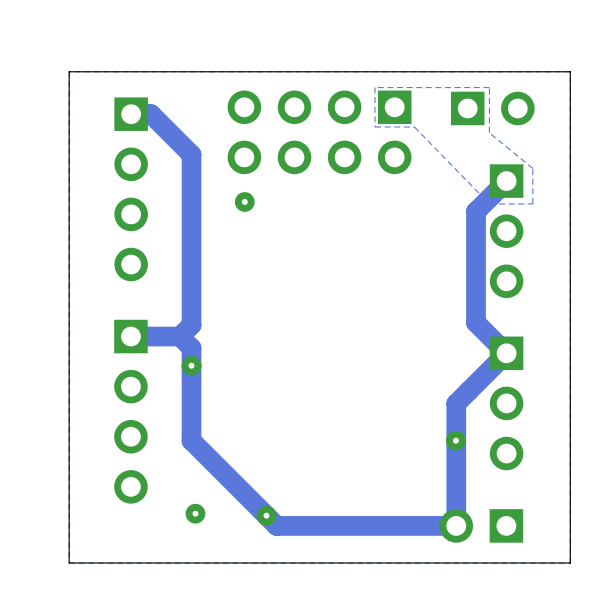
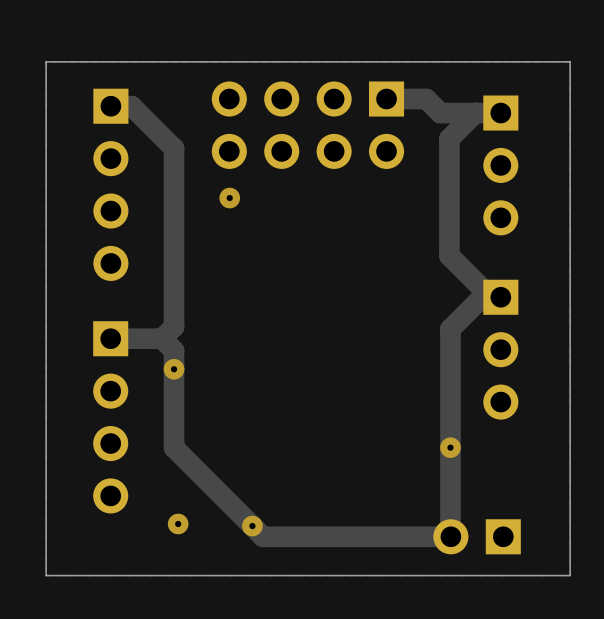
zone outline: (489, 87) (489, 132) (532, 168) (532, 203) (489, 203) (414, 127) (374, 127) (374, 87) (489, 87) -> none
track: none -> (386, 99) (426, 99) (440, 113) (500, 113)
part: (492, 108) -> none
track: none -> (475, 113) (449, 138) (449, 255) (490, 297)
part: none -> (500, 165)
track: (506, 181) (476, 211) (476, 322) (506, 353) (456, 403) (456, 525) -> (500, 297) (482, 297) (450, 329) (450, 536)
part: (506, 231) -> none
part position: (506, 403) -> (500, 349)

